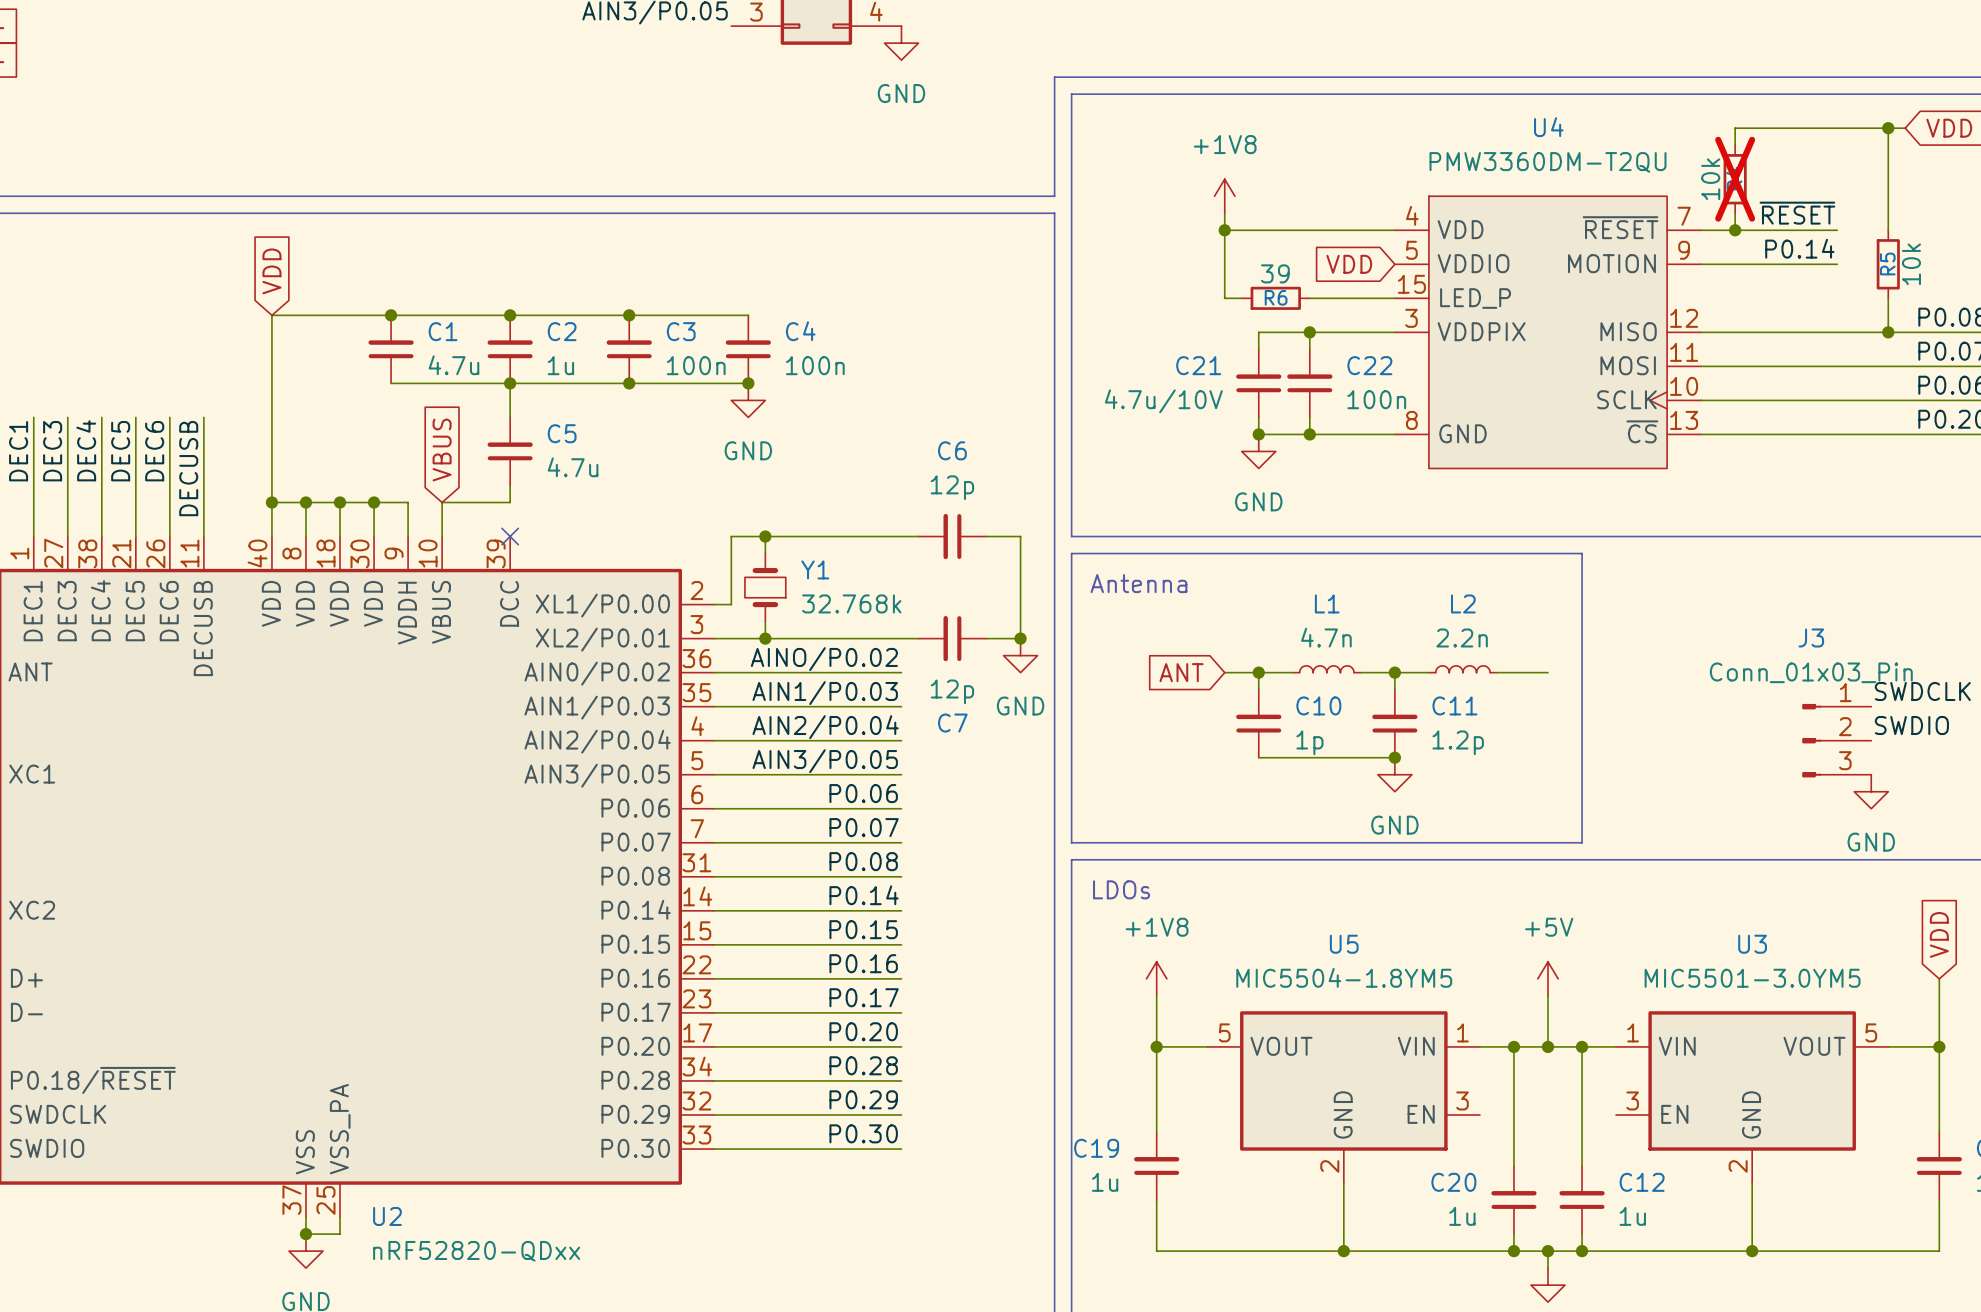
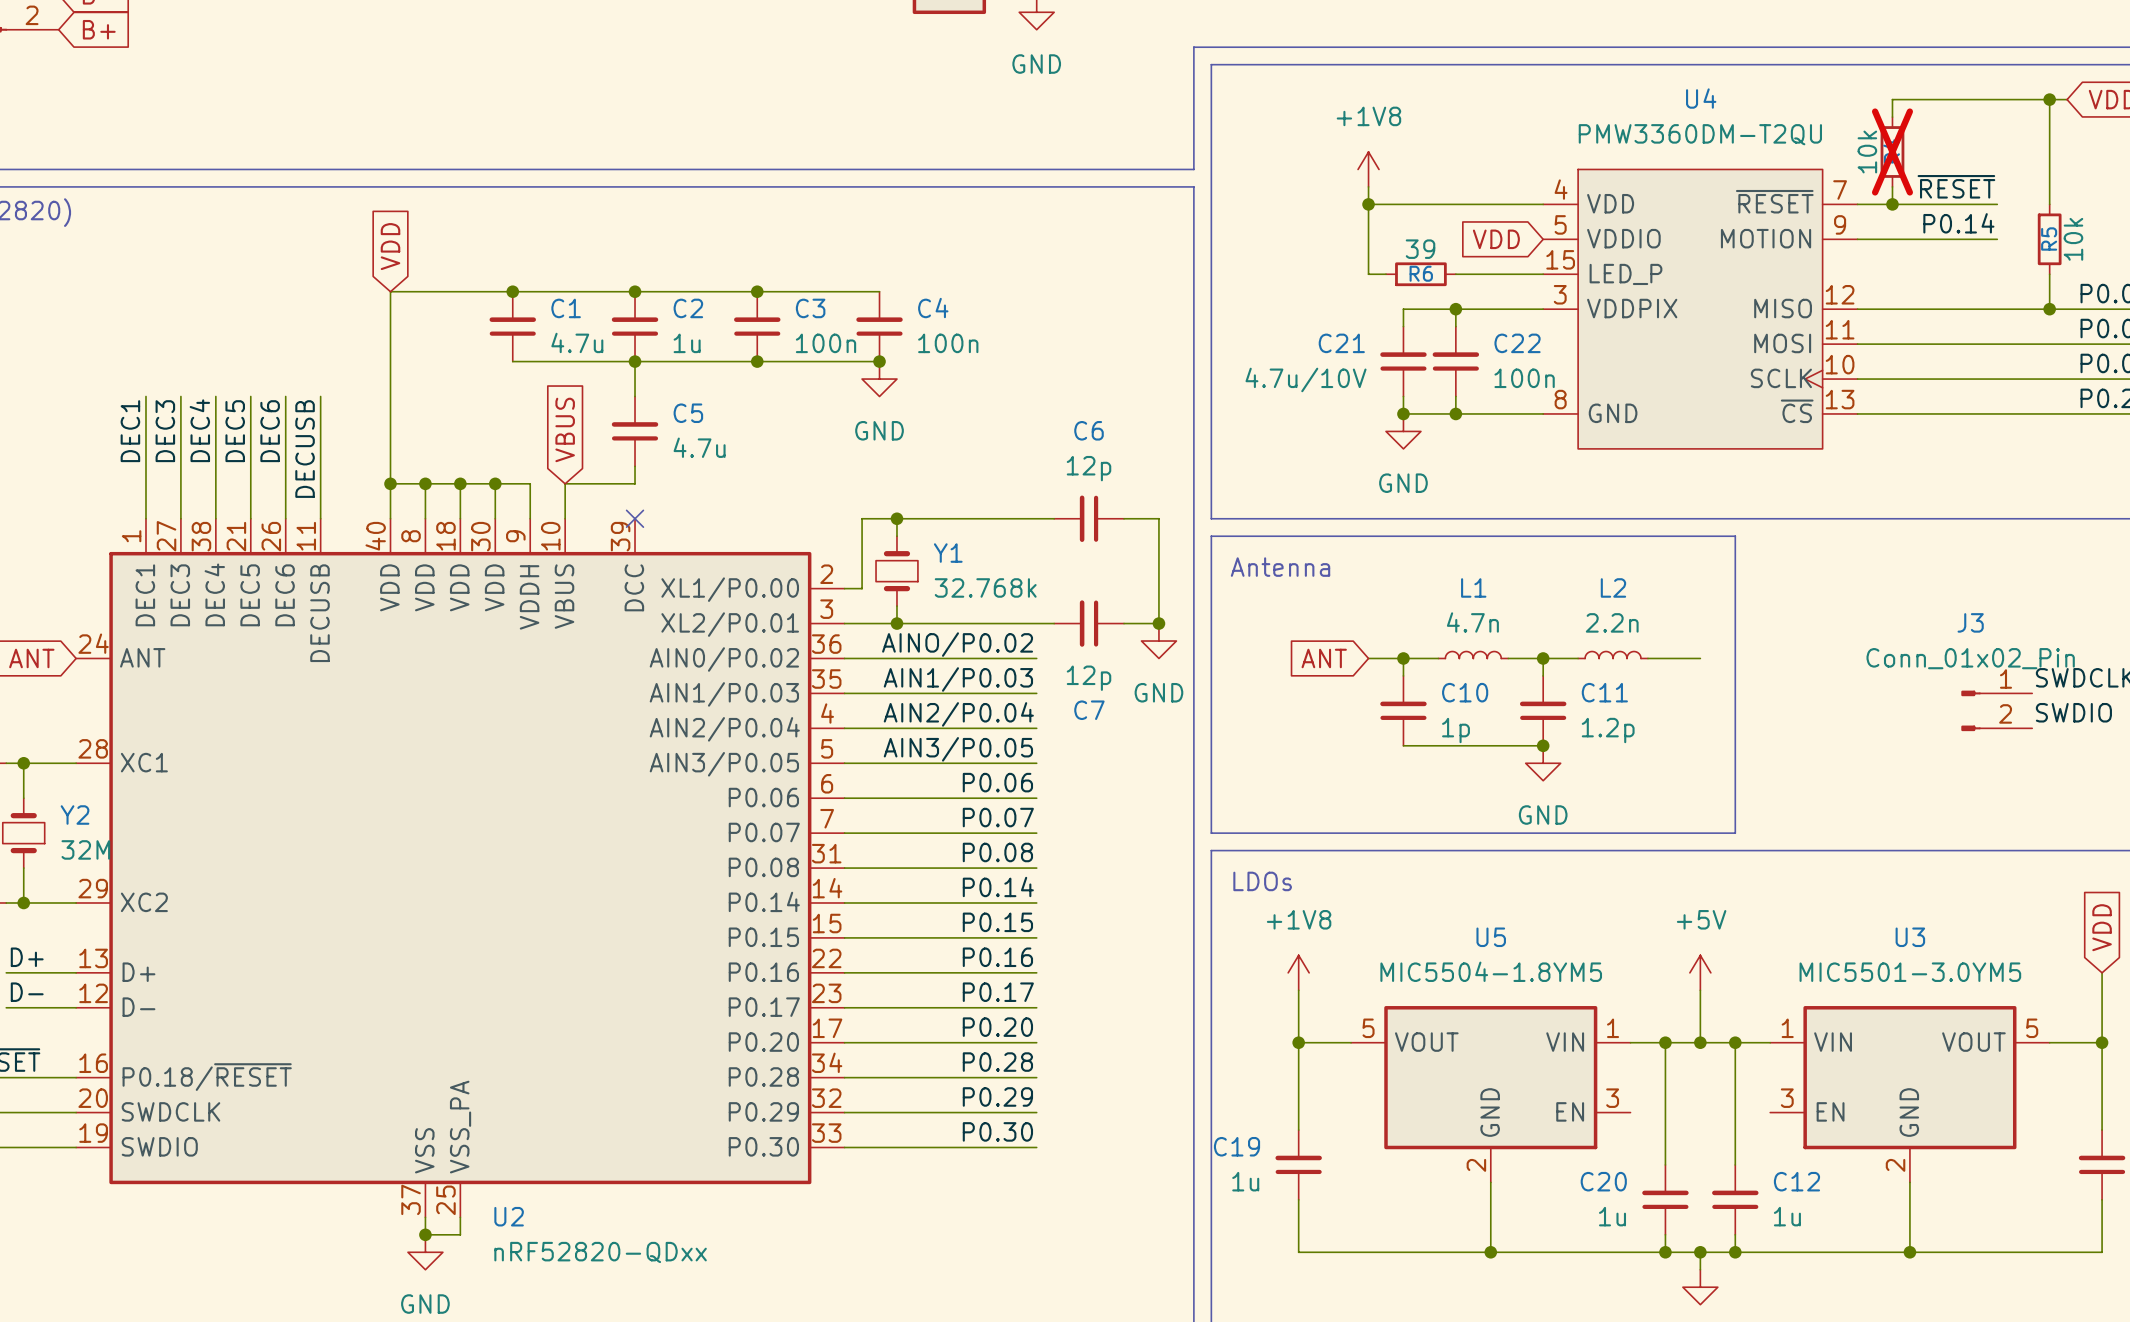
J3 value: Conn_01x03_Pin (1811, 672) -> Conn_01x02_Pin (1970, 658)
J3 symbol: [1802, 703, 1872, 778] -> [1961, 690, 2033, 732]
power symbol: GND (1871, 791) -> none

